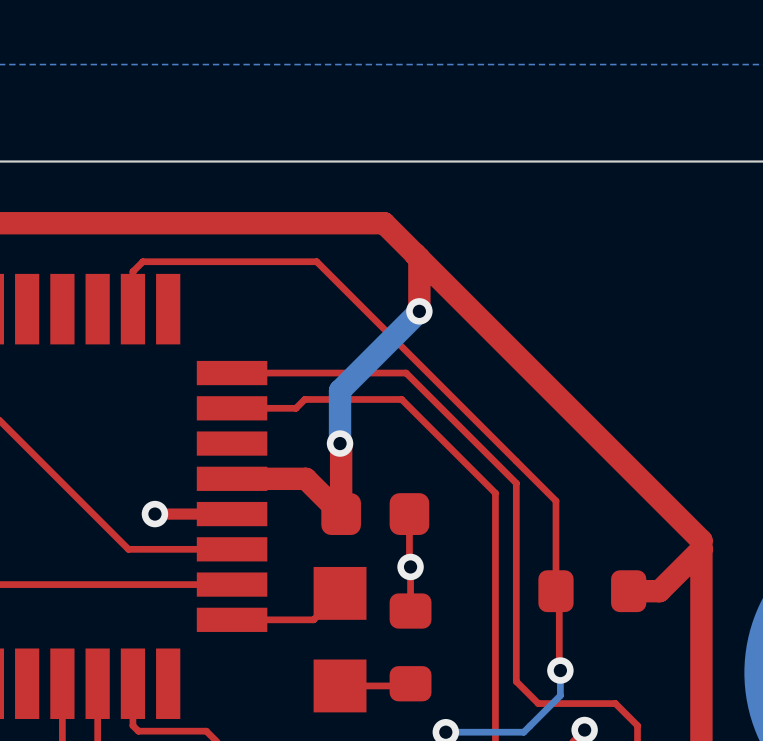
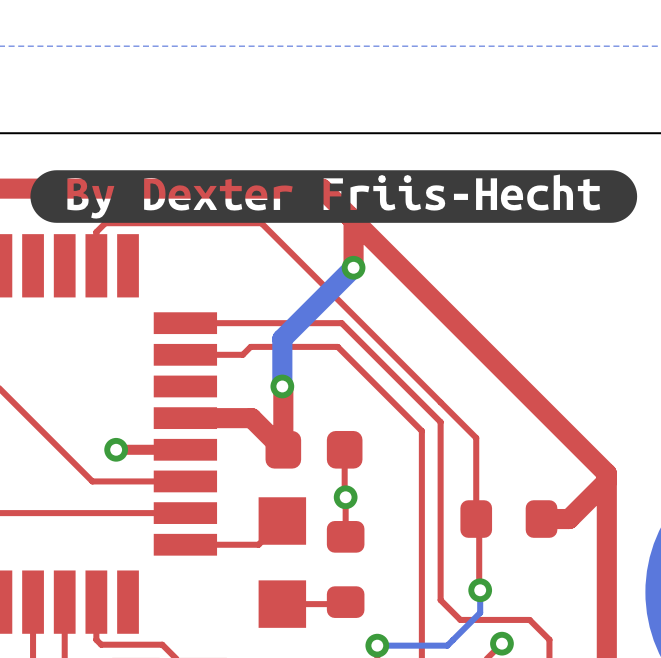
drawing: none -> [30, 170, 638, 223]

